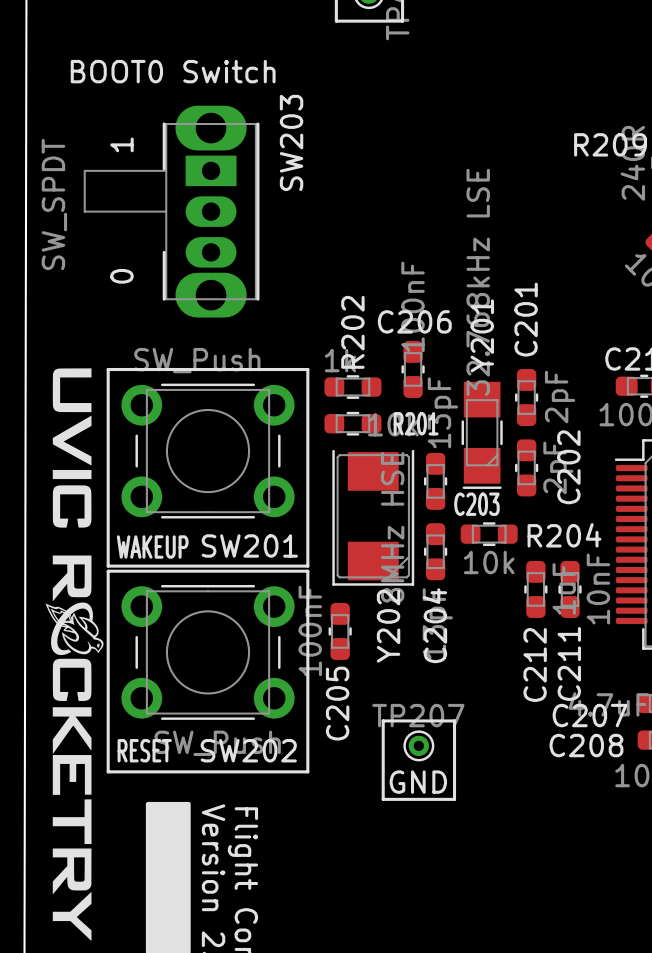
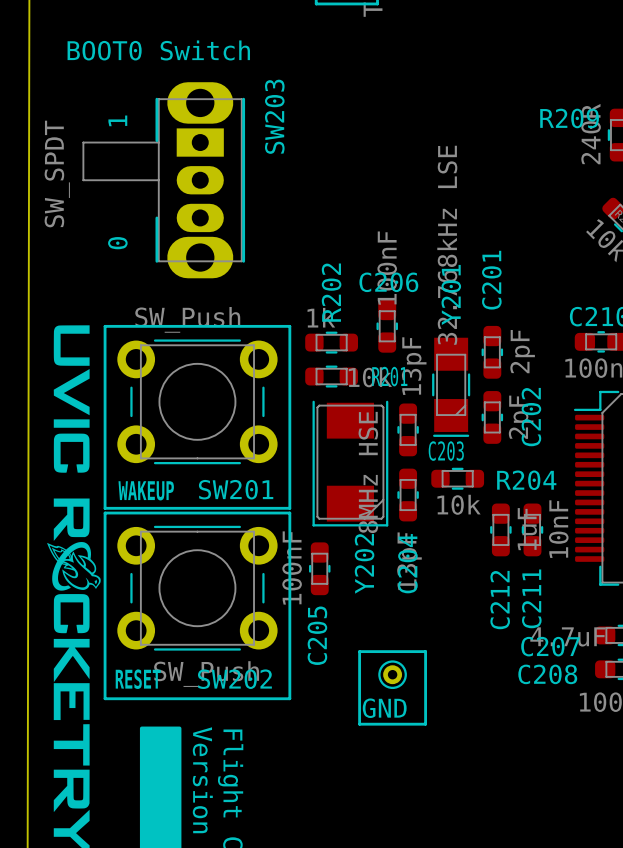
TP207 name: TP207 (418, 715) -> none

